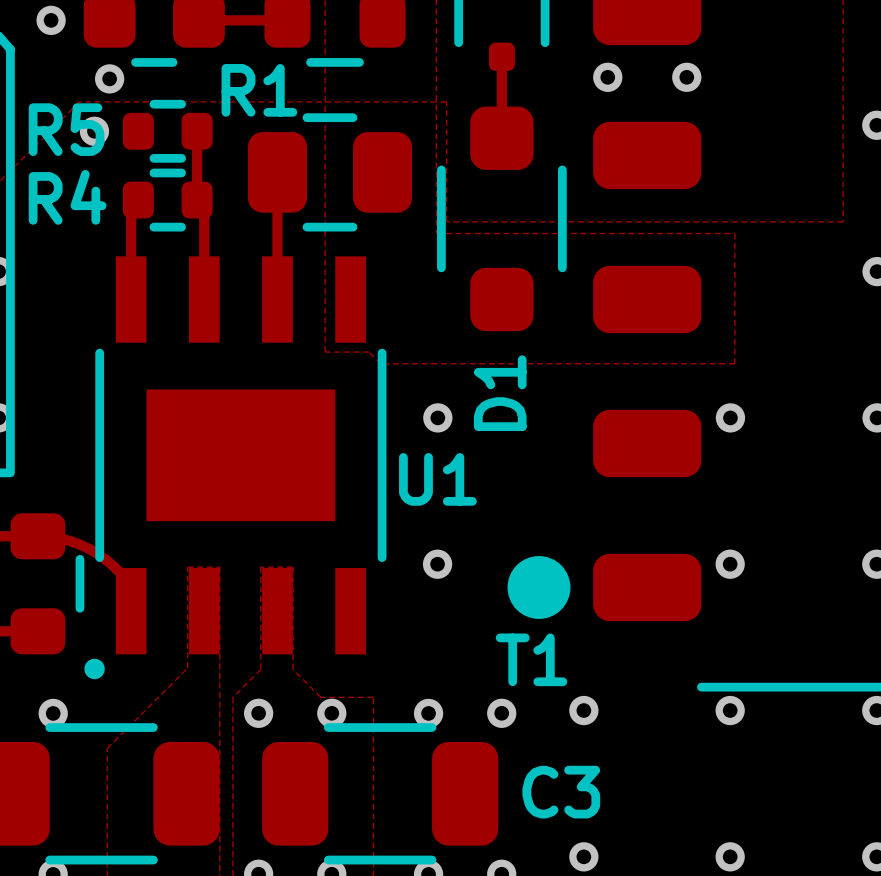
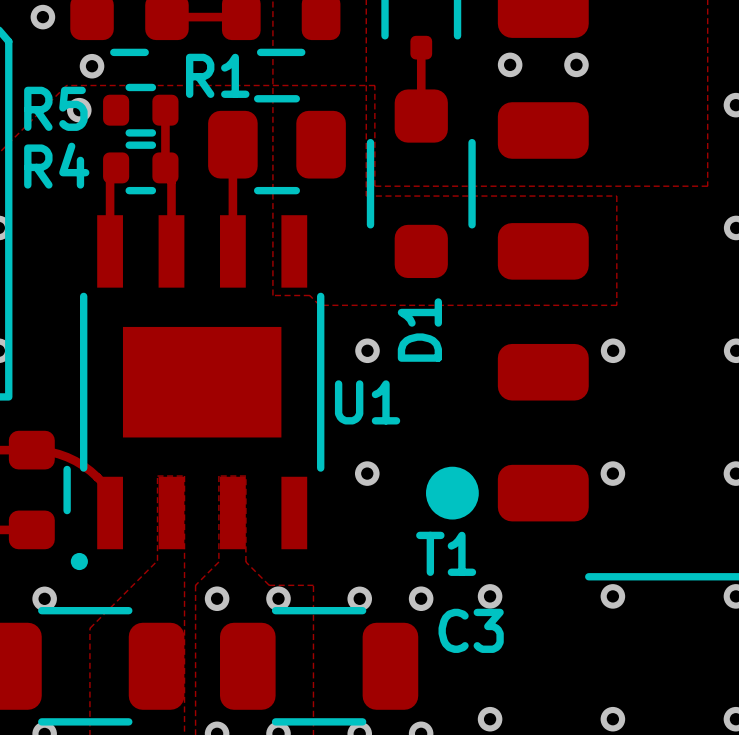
C3 name position: C3 (561, 792) -> C3 (471, 630)

